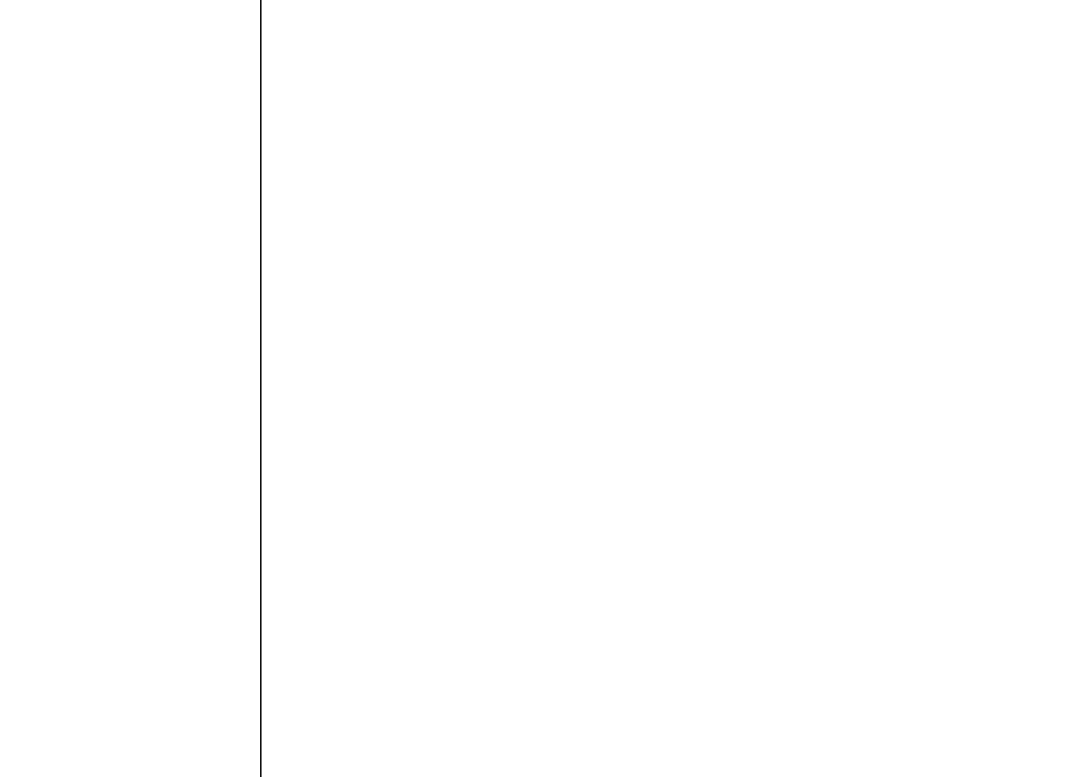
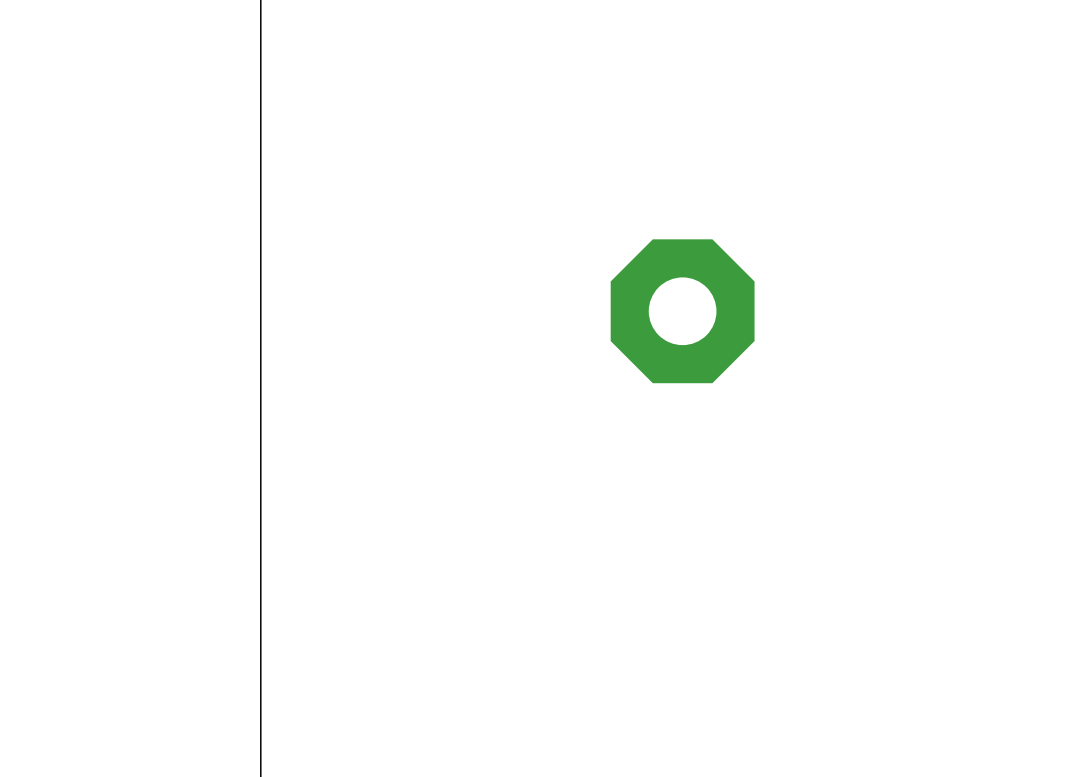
part: none -> (682, 311)

